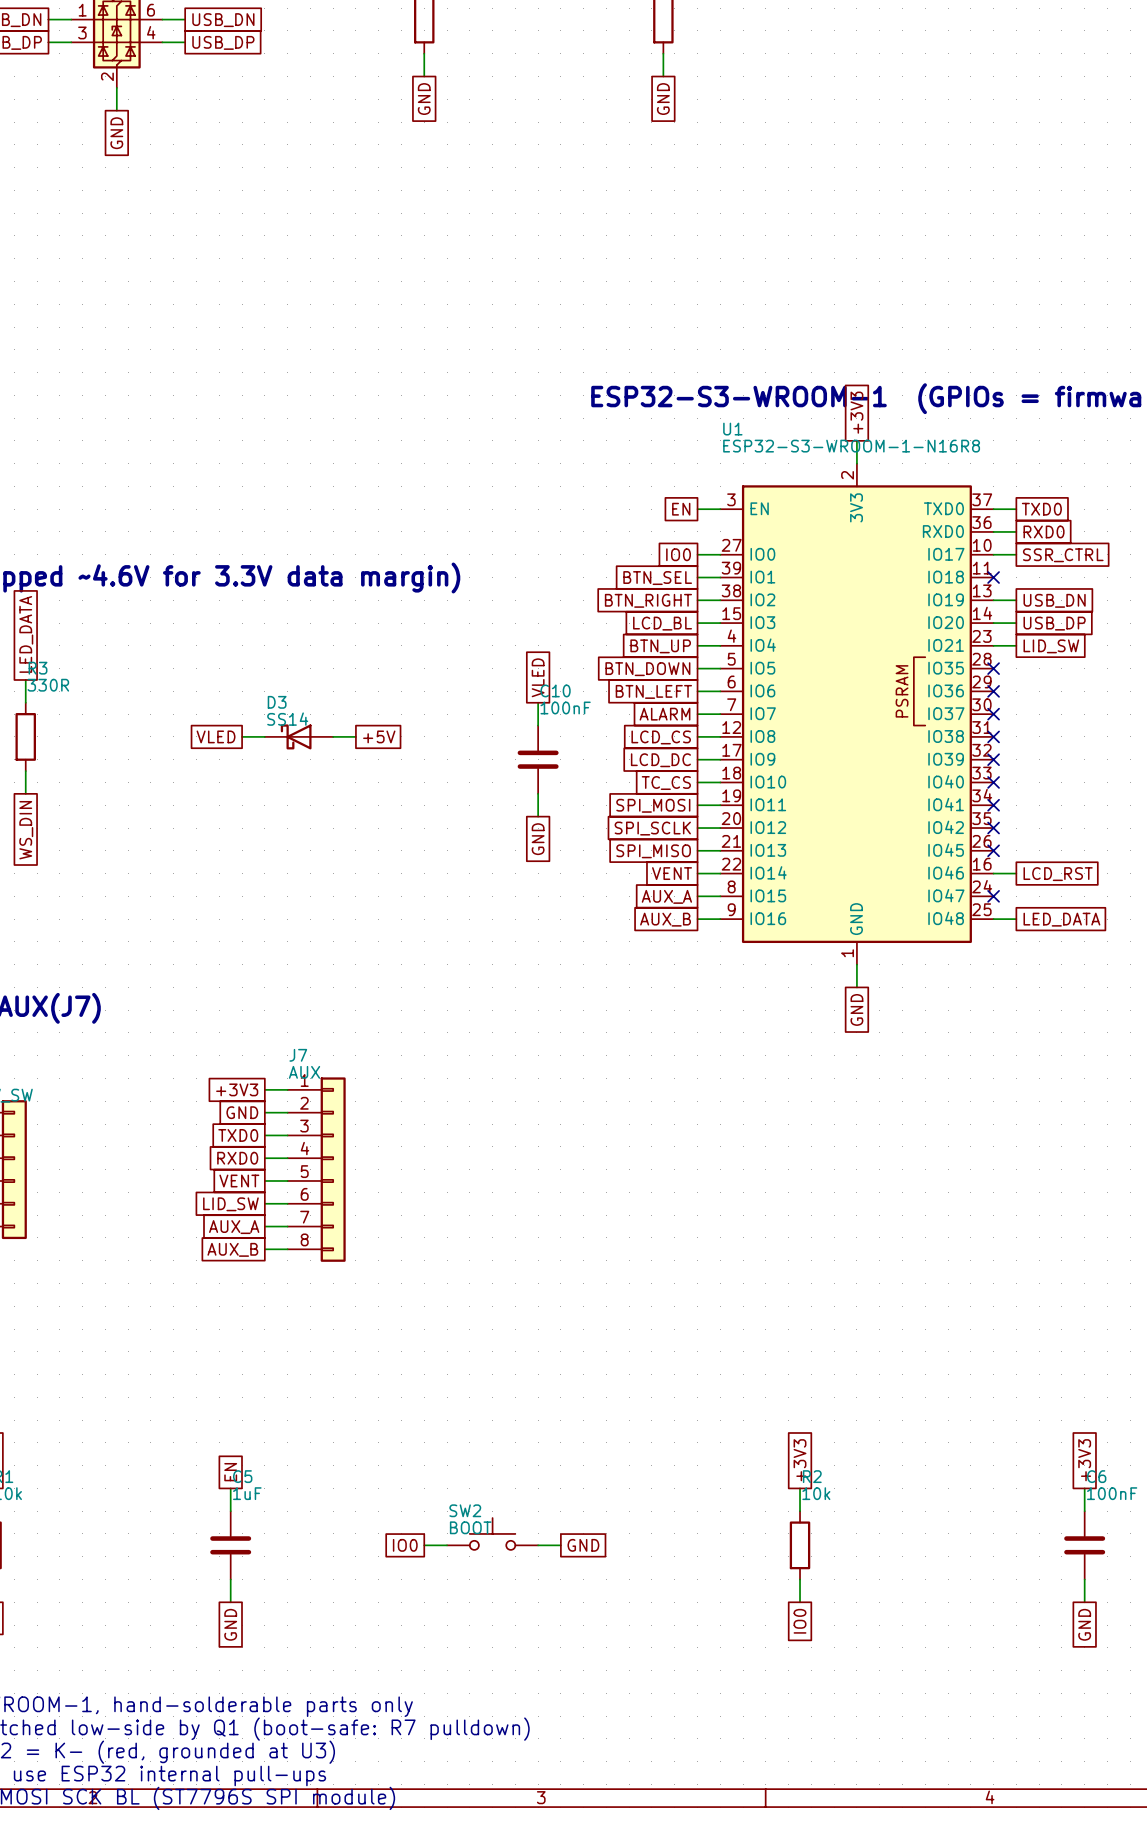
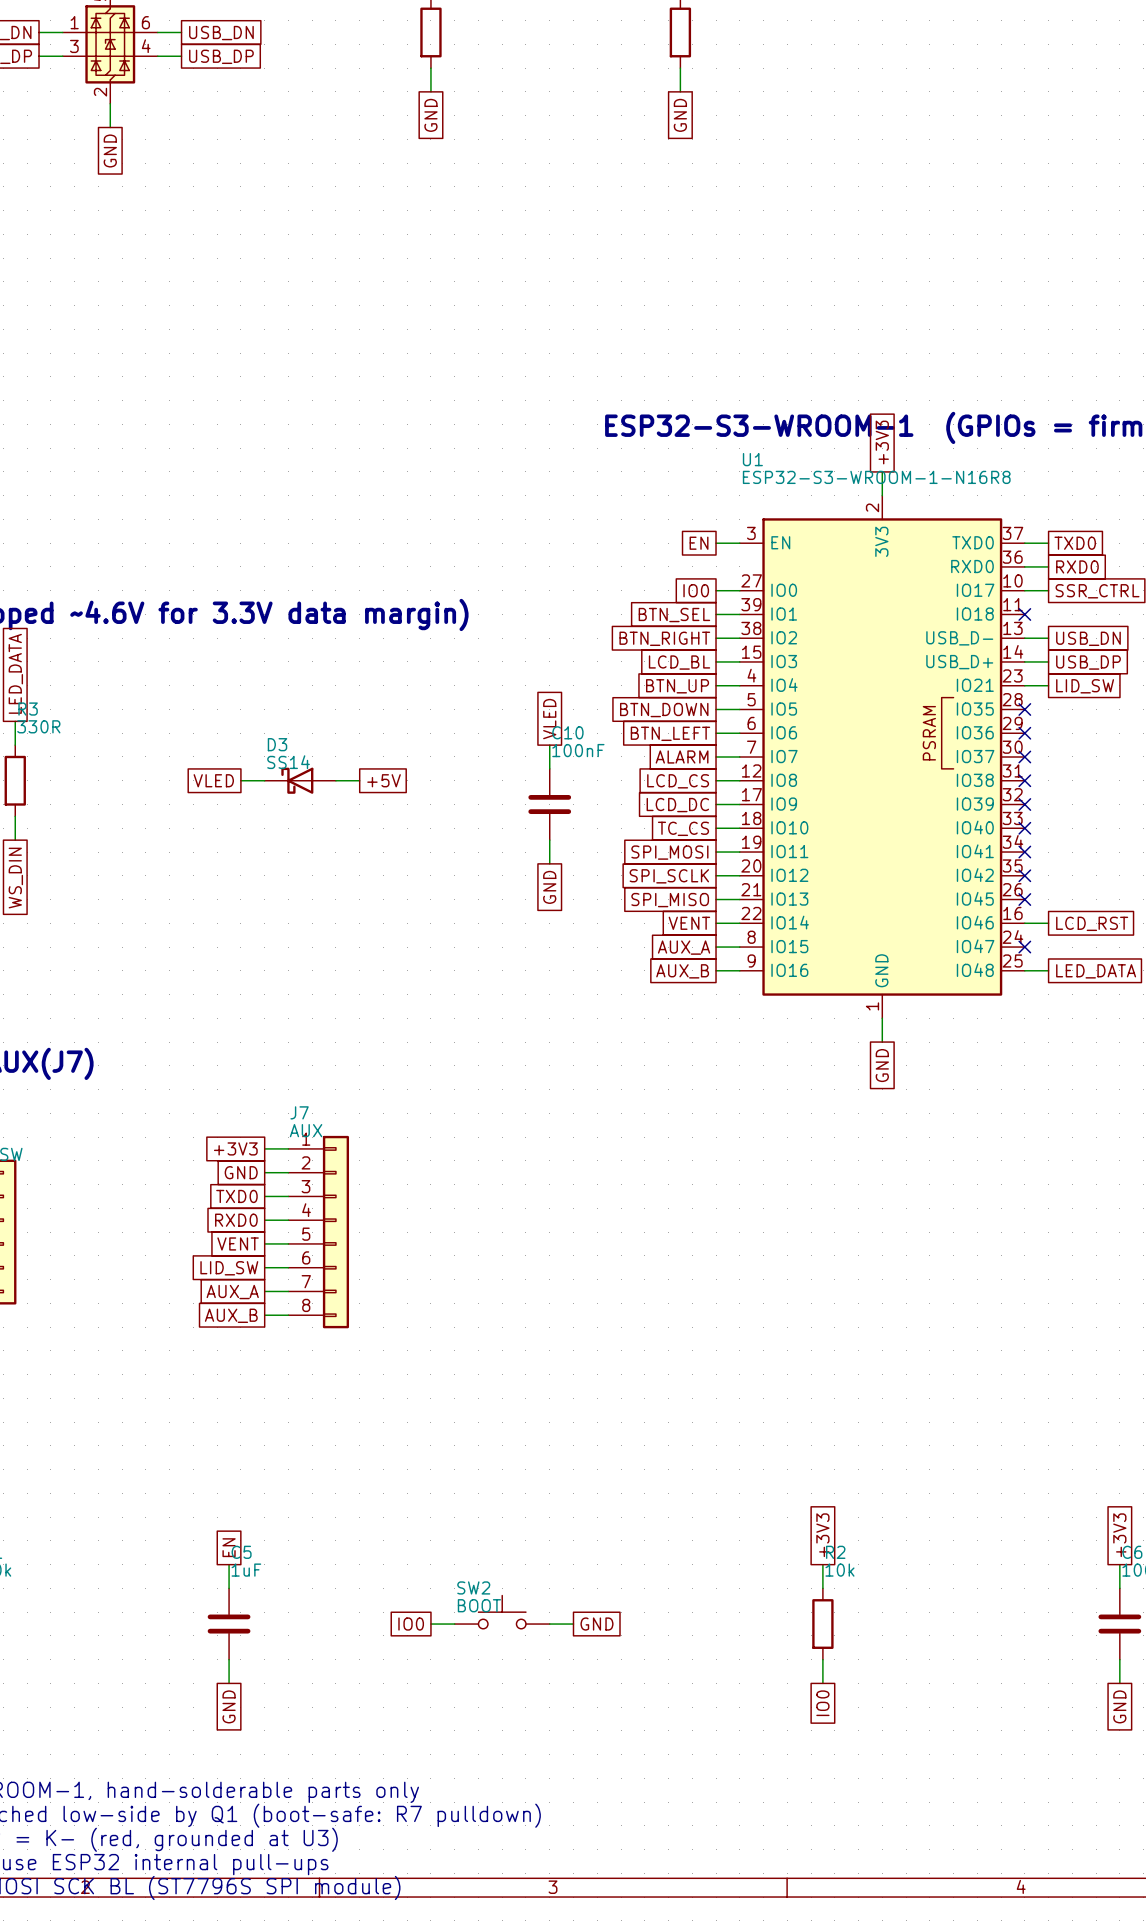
U1 pin name: IO19 (946, 599) -> USB_D- (959, 638)
U1 pin name: IO20 (946, 622) -> USB_D+ (959, 662)

